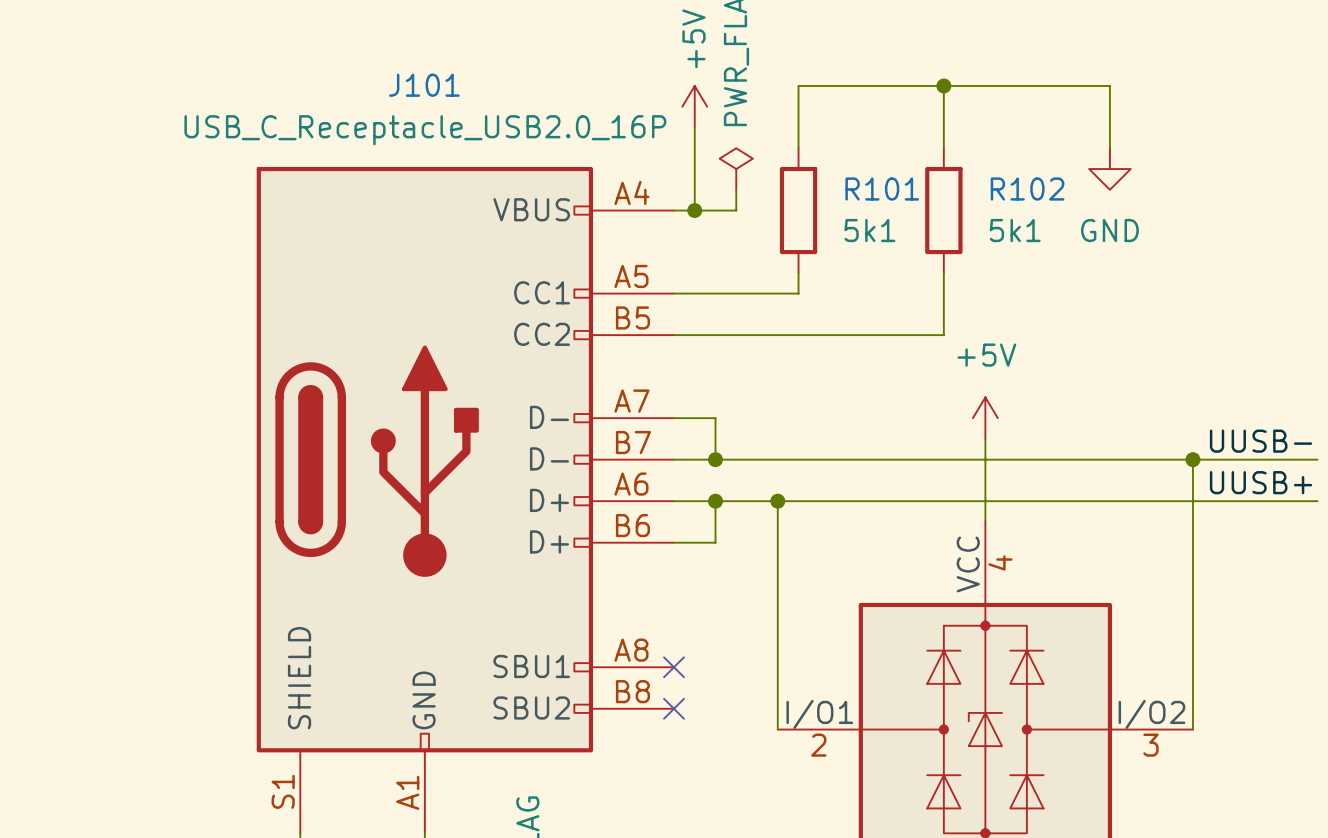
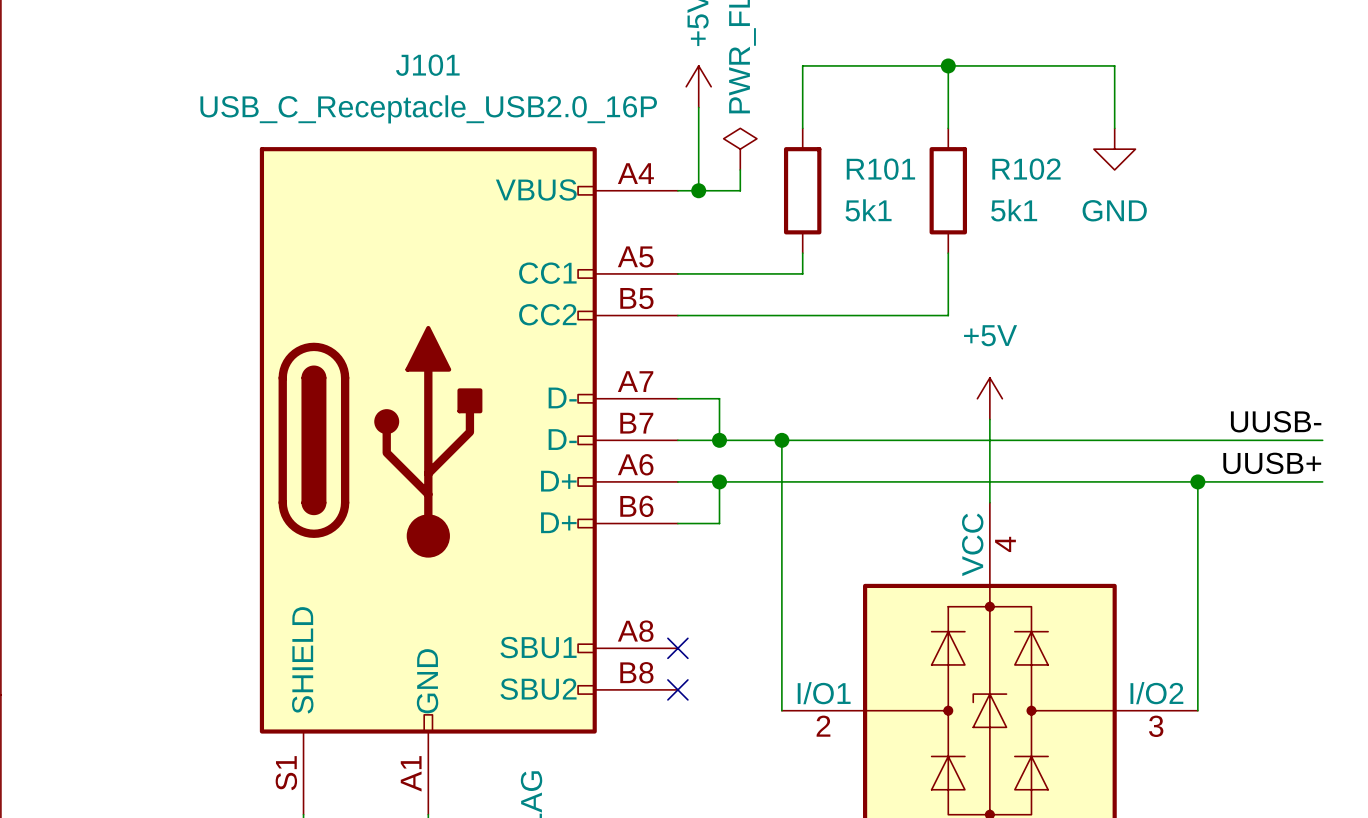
wire: none -> (781, 440) (781, 481)
wire: (1192, 459) (1192, 501) -> none
junction position: (1192, 459) -> (1197, 481)
junction position: (777, 501) -> (781, 440)

